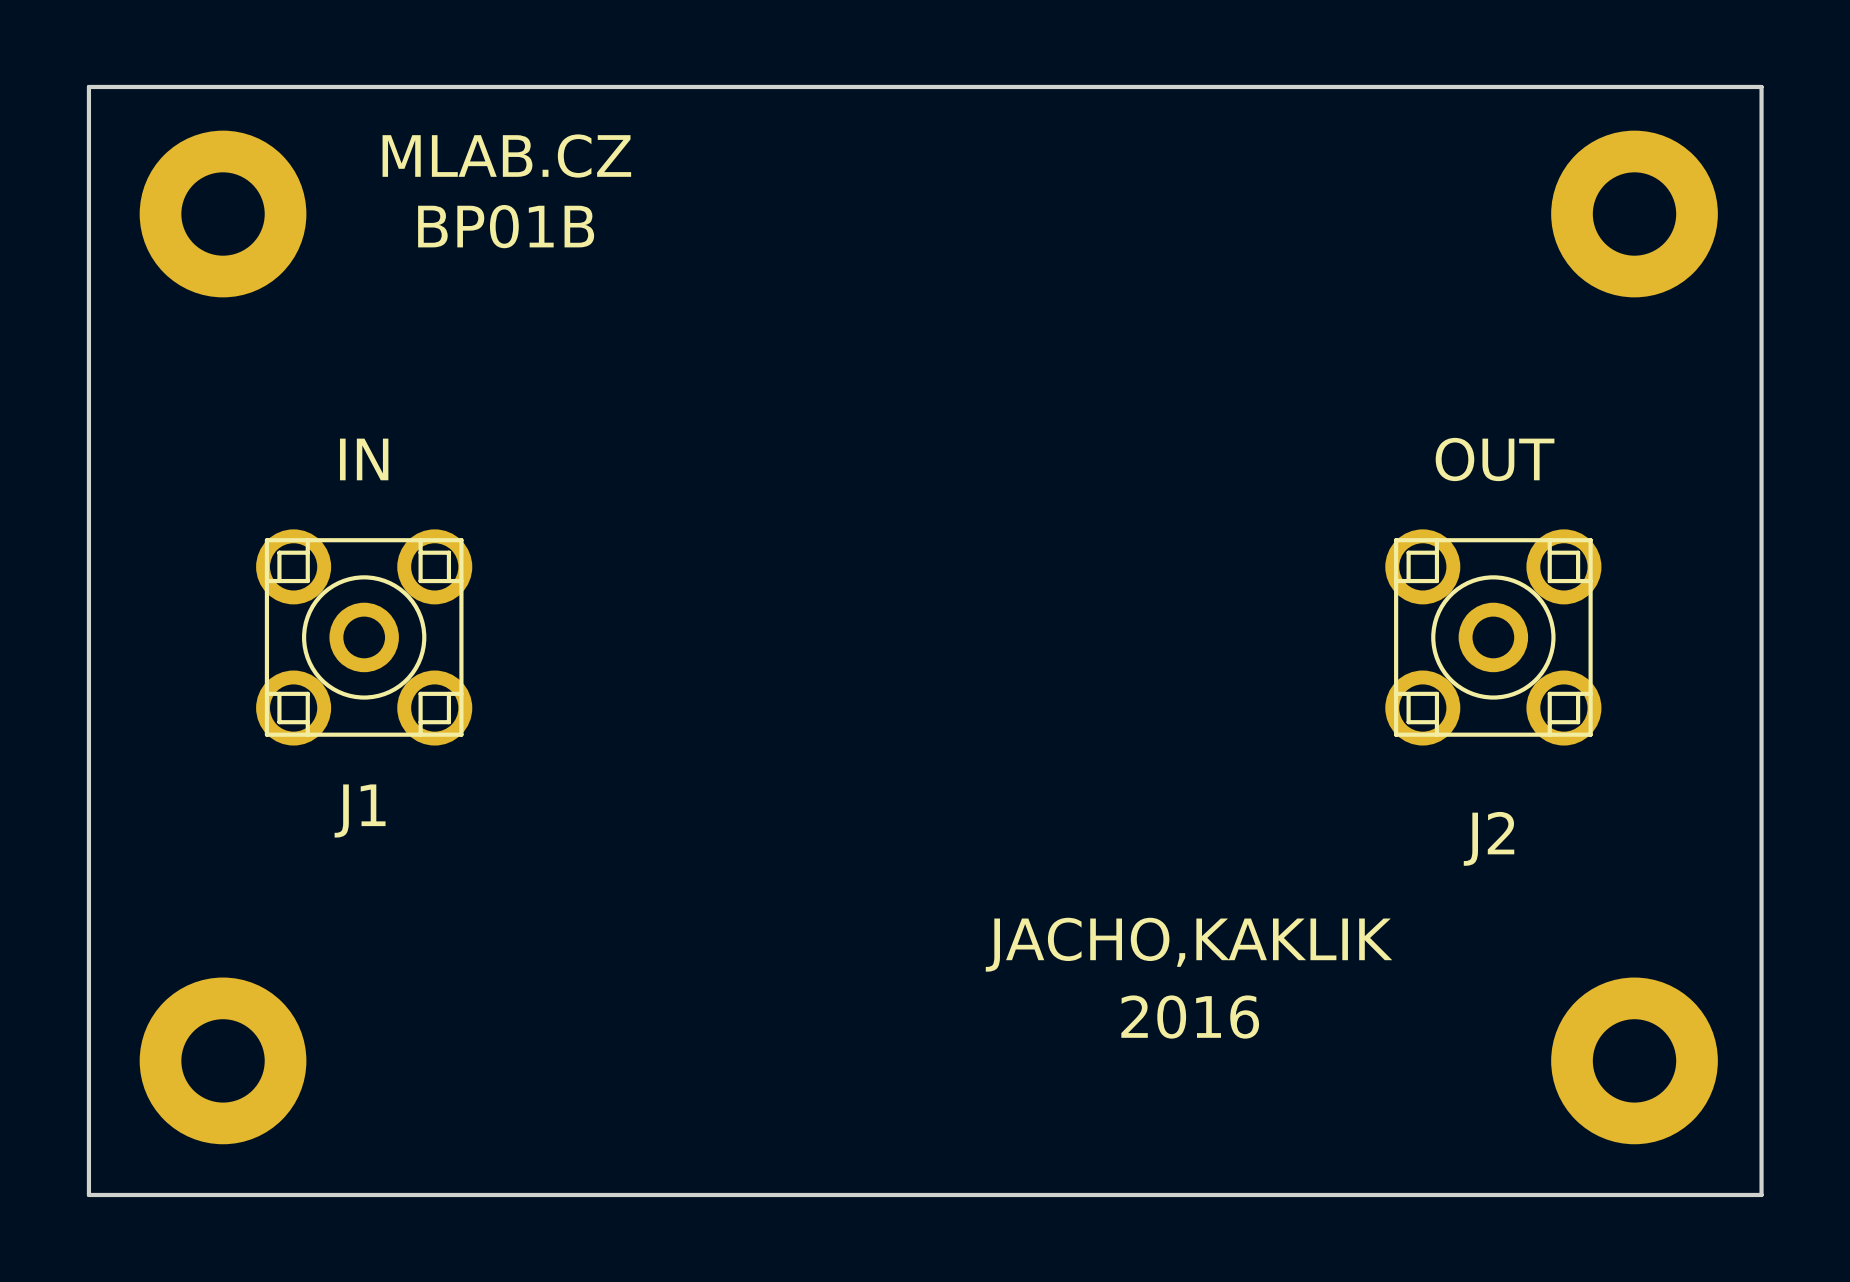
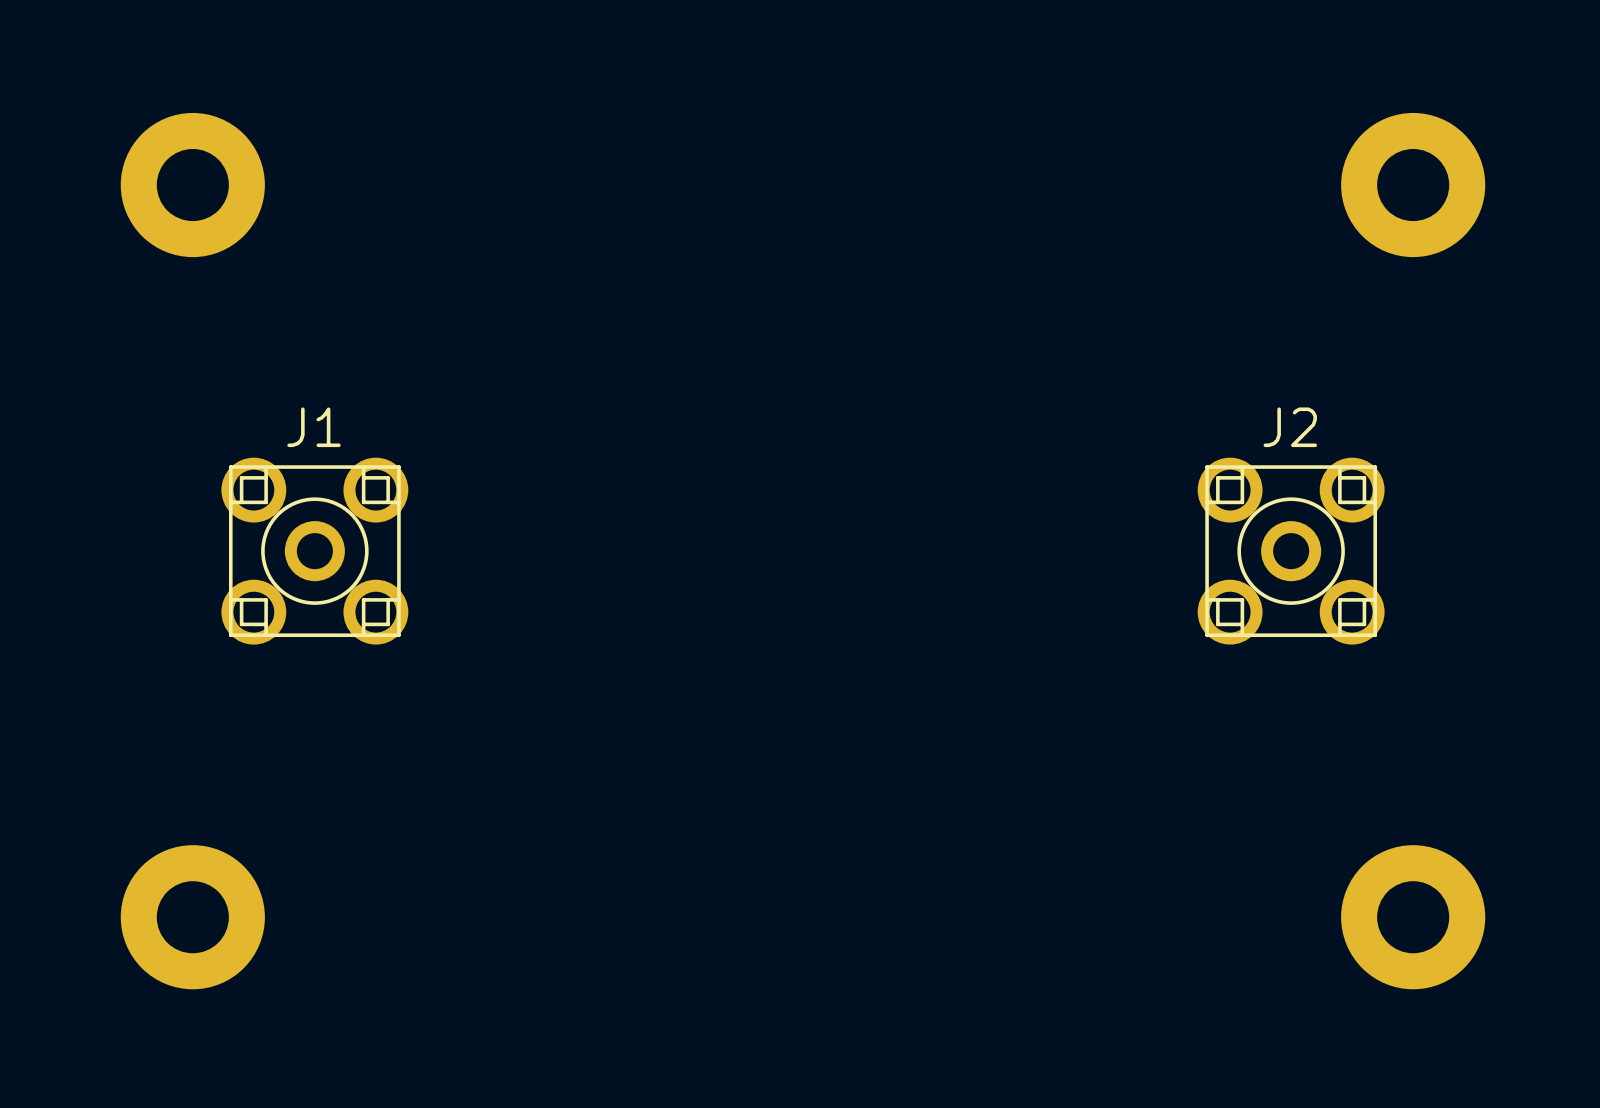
board edge: (88, 86) (88, 1194) (1761, 1194) (1761, 86) (88, 86) -> none
text: MLAB.CZ (506, 156) -> none
text: BP01B (506, 226) -> none
text: IN (364, 459) -> none
text: OUT (1495, 459) -> none
J1 name position: J1 (360, 810) -> J1 (314, 427)
J2 name position: J2 (1489, 838) -> J2 (1290, 427)
text: JACHO,KAKLIK (1189, 944) -> none
text: 2016 (1190, 1017) -> none

